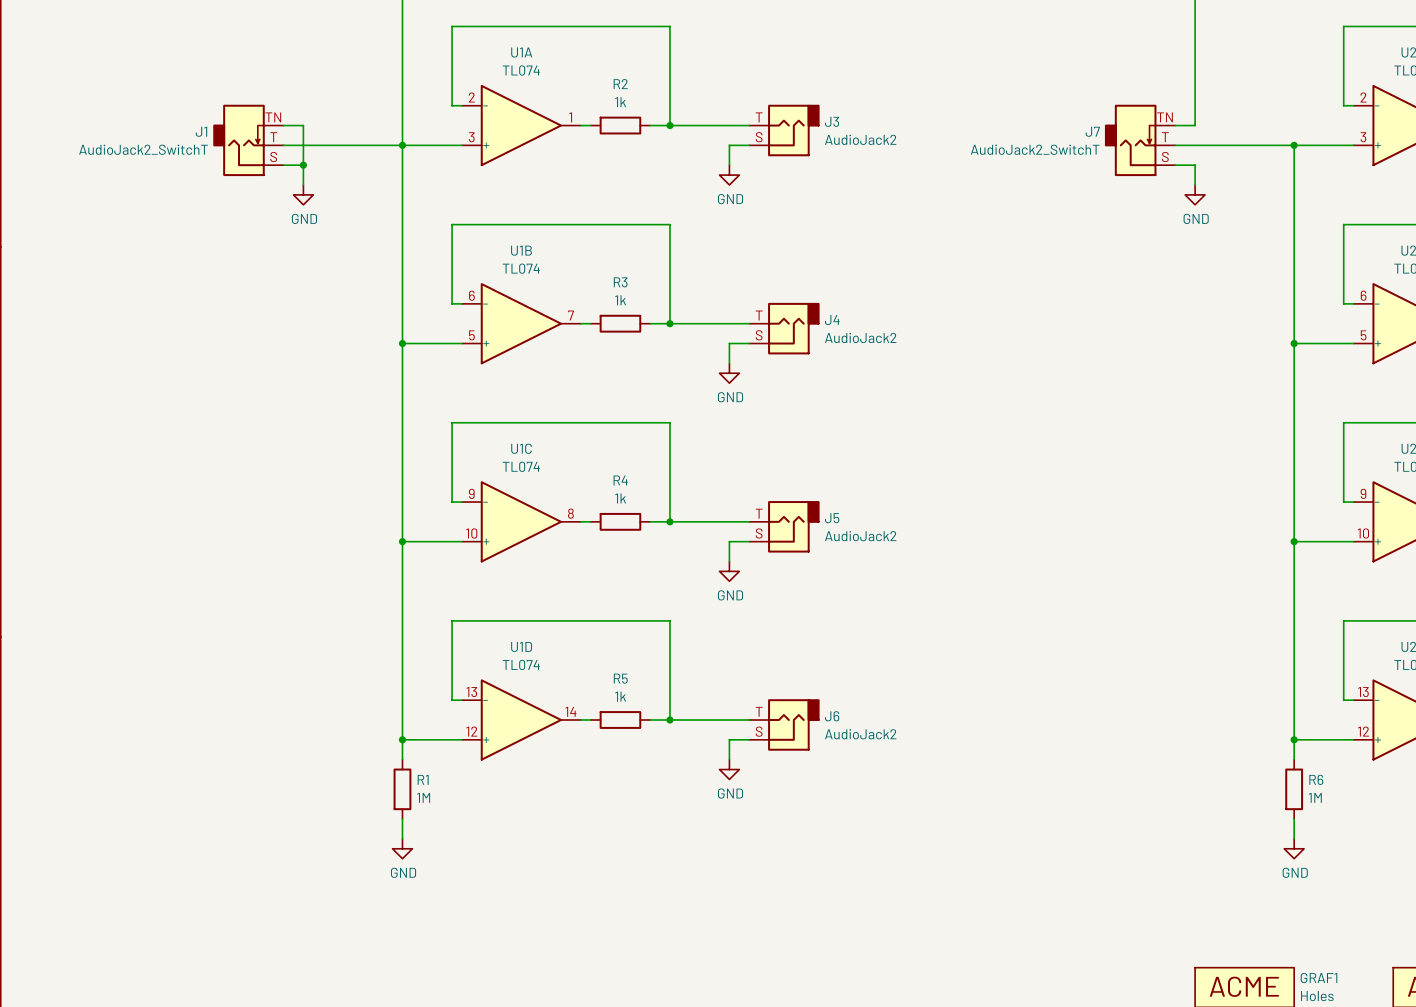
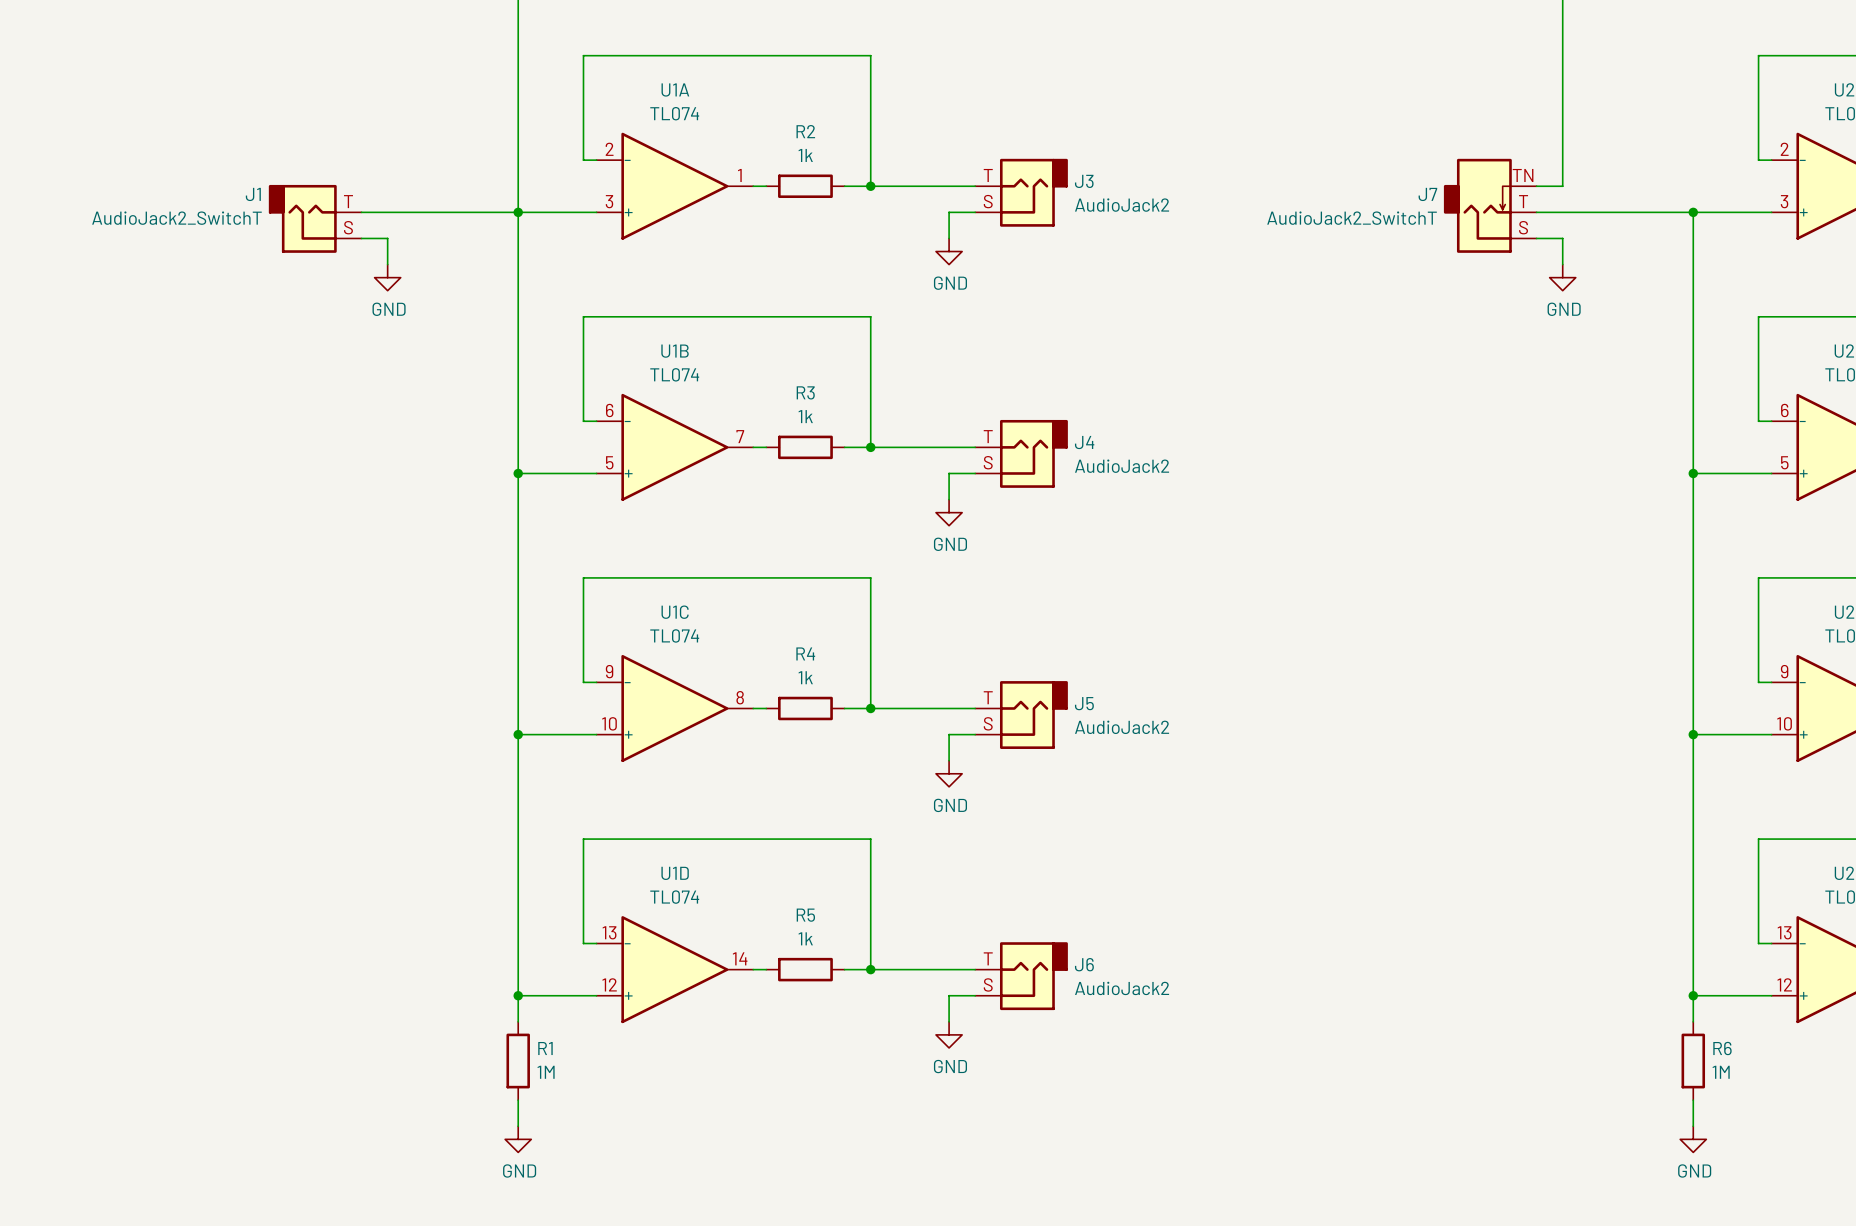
J1 symbol: [213, 104, 284, 177] -> [268, 184, 362, 253]
wire: (283, 125) (303, 125) (303, 165) -> none
junction: (303, 165) -> none

